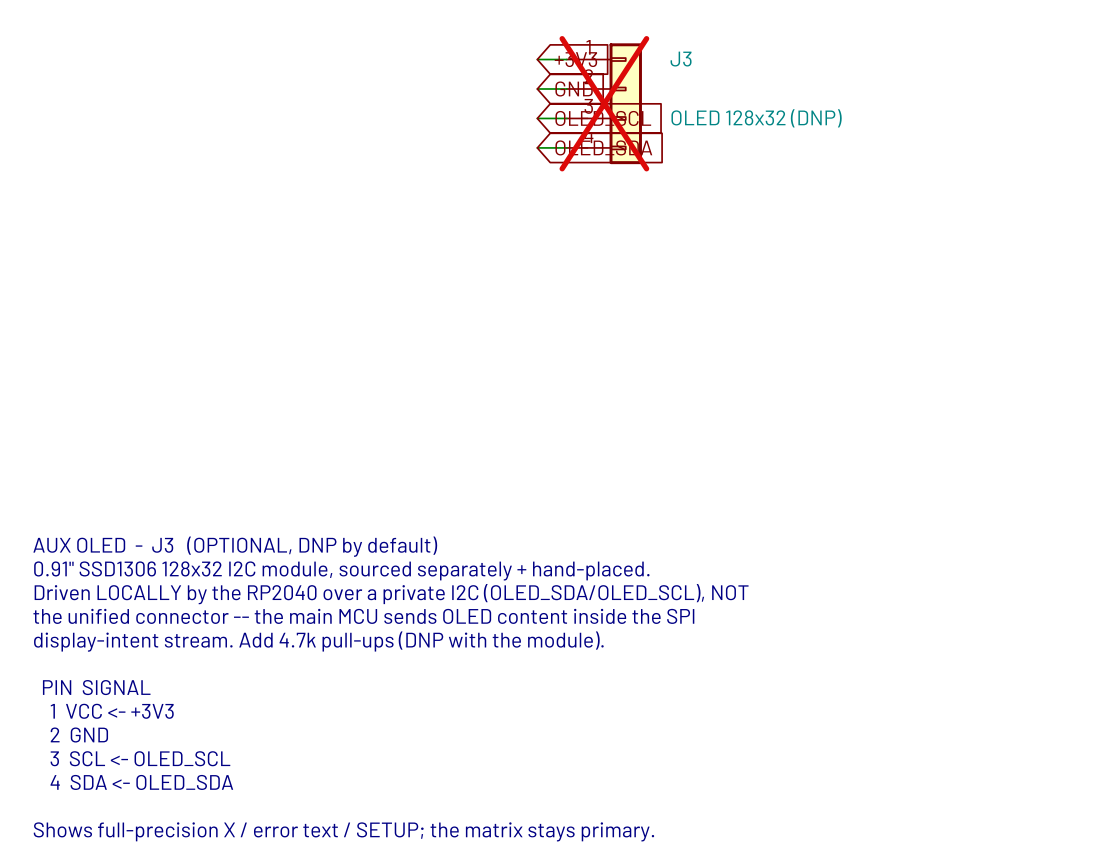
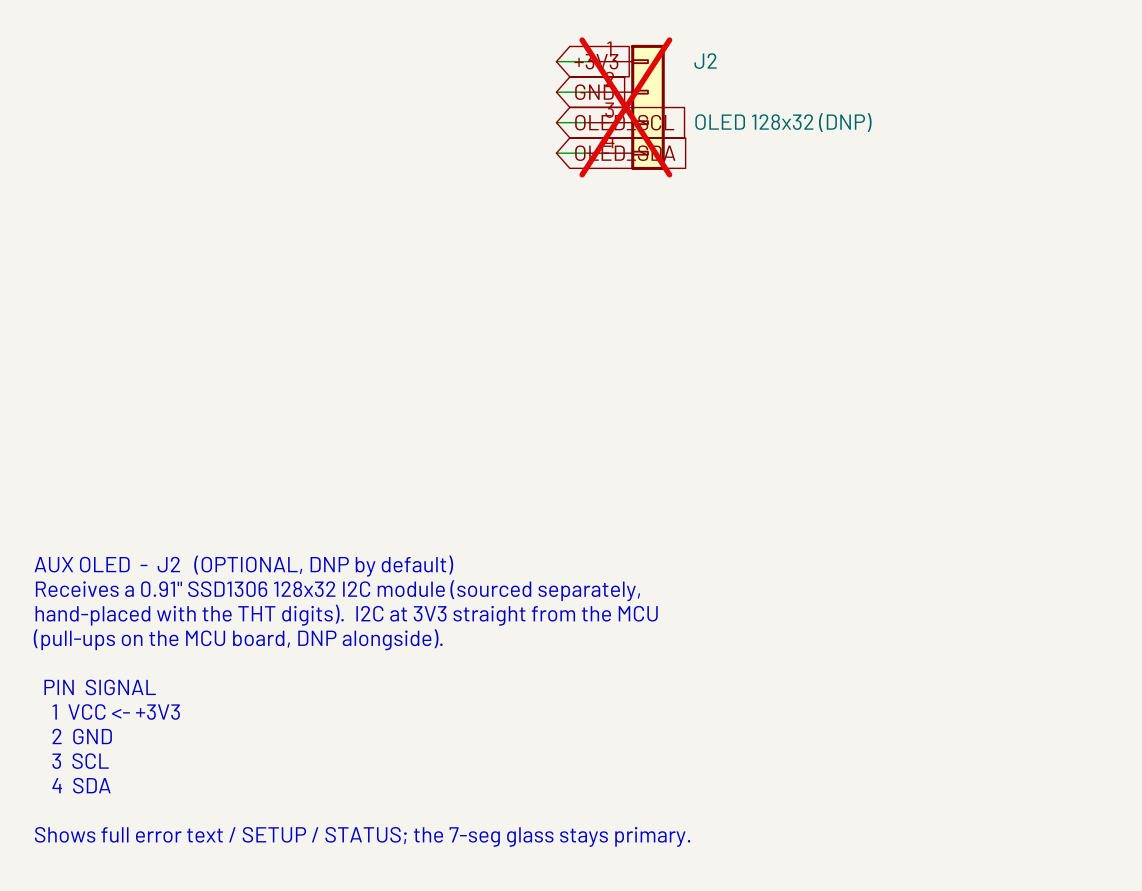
J3 name: J3 (681, 59) -> J2 (705, 61)
text: AUX OLED - J3 (OPTIONAL, DNP by default) (235, 546) -> AUX OLED - J2 (OPTIONAL, DNP by default) (243, 566)
text: 0.91" SSD1306 128x32 I2C module, sourced separately + hand-placed. (341, 570) -> Receives a 0.91" SSD1306 128x32 I2C module (sourced separately, (338, 590)
text: Driven LOCALLY by the RP2040 over a private I2C (OLED_SDA/OLED_SCL), NOT (391, 594) -> hand-placed with the THT digits). I2C at 3V3 straight from the MCU (346, 615)
text: the unified connector -- the main MCU sends OLED content inside the SPI (363, 616) -> (pull-ups on the MCU board, DNP alongside). (238, 639)
text: display-intent stream. Add 4.7k pull-ups (DNP with the module). (318, 641) -> none
text: none -> PIN SIGNAL (100, 687)
text: PIN SIGNAL (96, 687) -> 1 VCC <- +3V3 (116, 712)
text: 1 VCC <- +3V3 (112, 711) -> 2 GND (82, 736)
text: 2 GND (79, 735) -> 3 SCL (80, 761)
text: 3 SCL <- OLED_SCL (140, 758) -> 4 SDA (81, 785)
text: 4 SDA <- OLED_SDA (141, 782) -> none
text: Shows full-precision X / error text / SETUP; the matrix stays primary. (343, 831) -> Shows full error text / SETUP / STATUS; the 7-seg glass stays primary. (362, 836)

